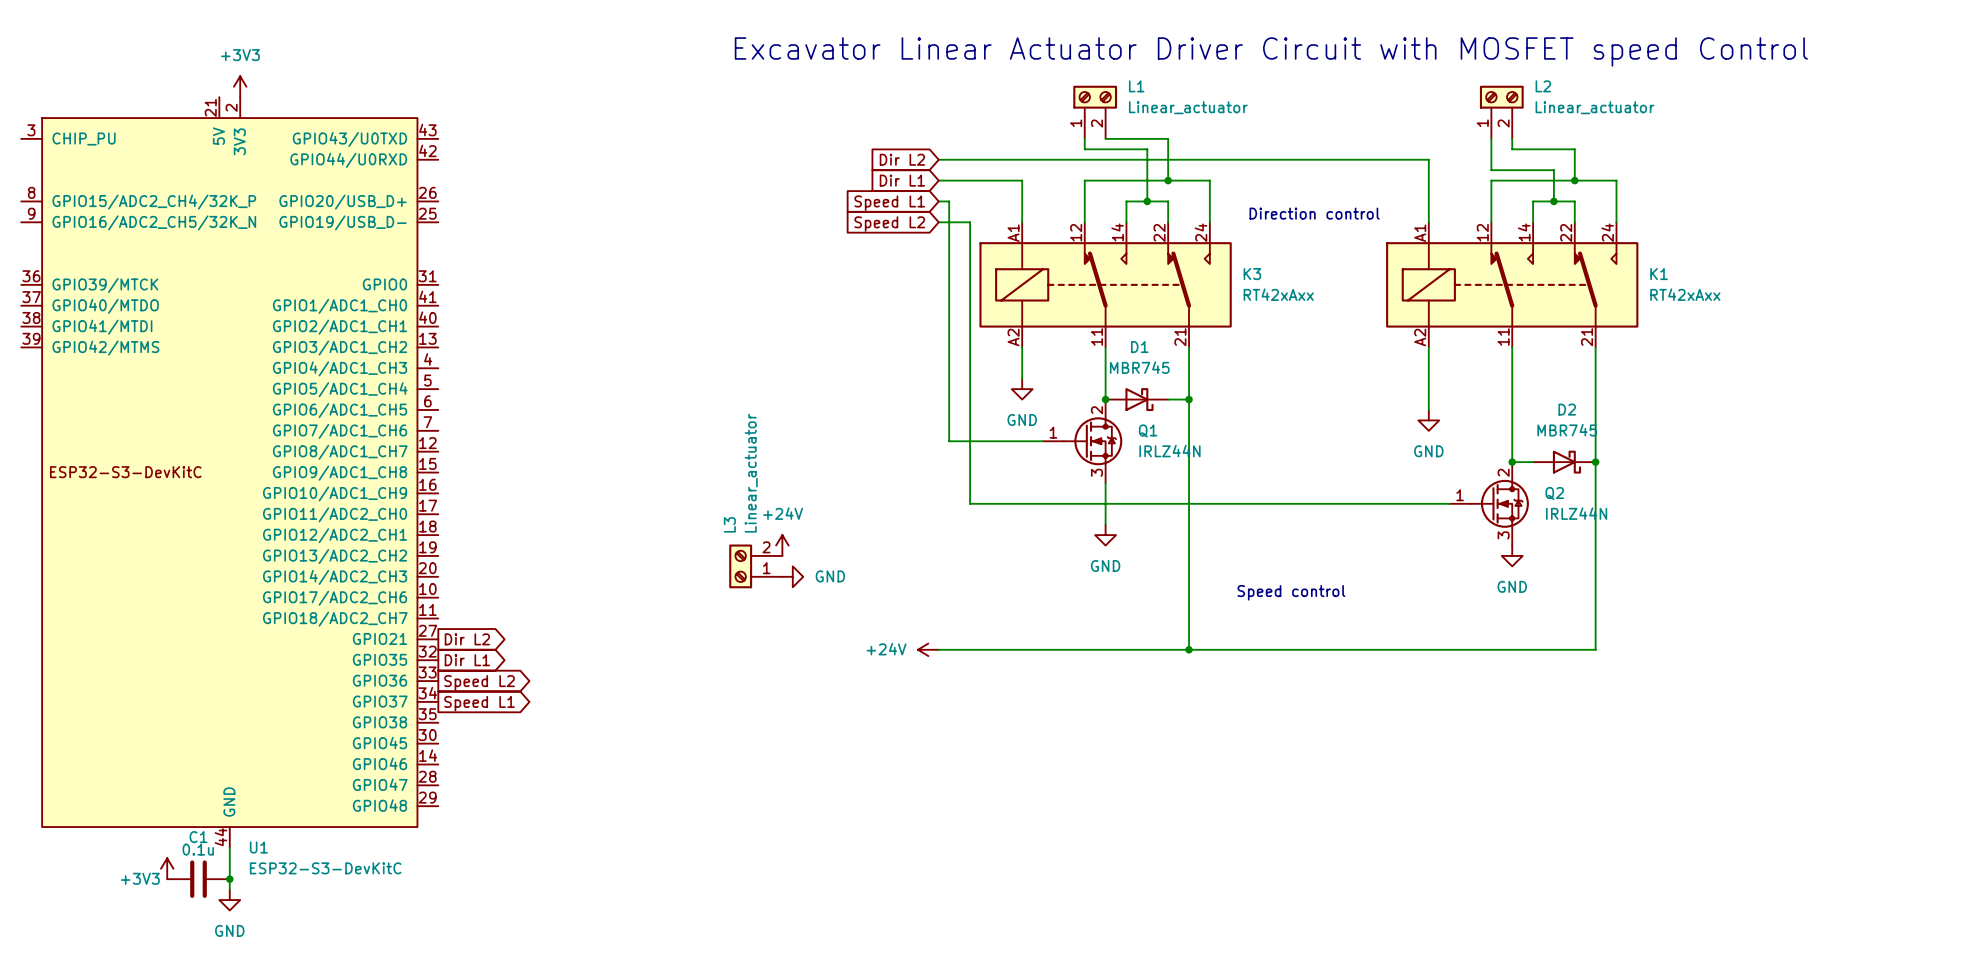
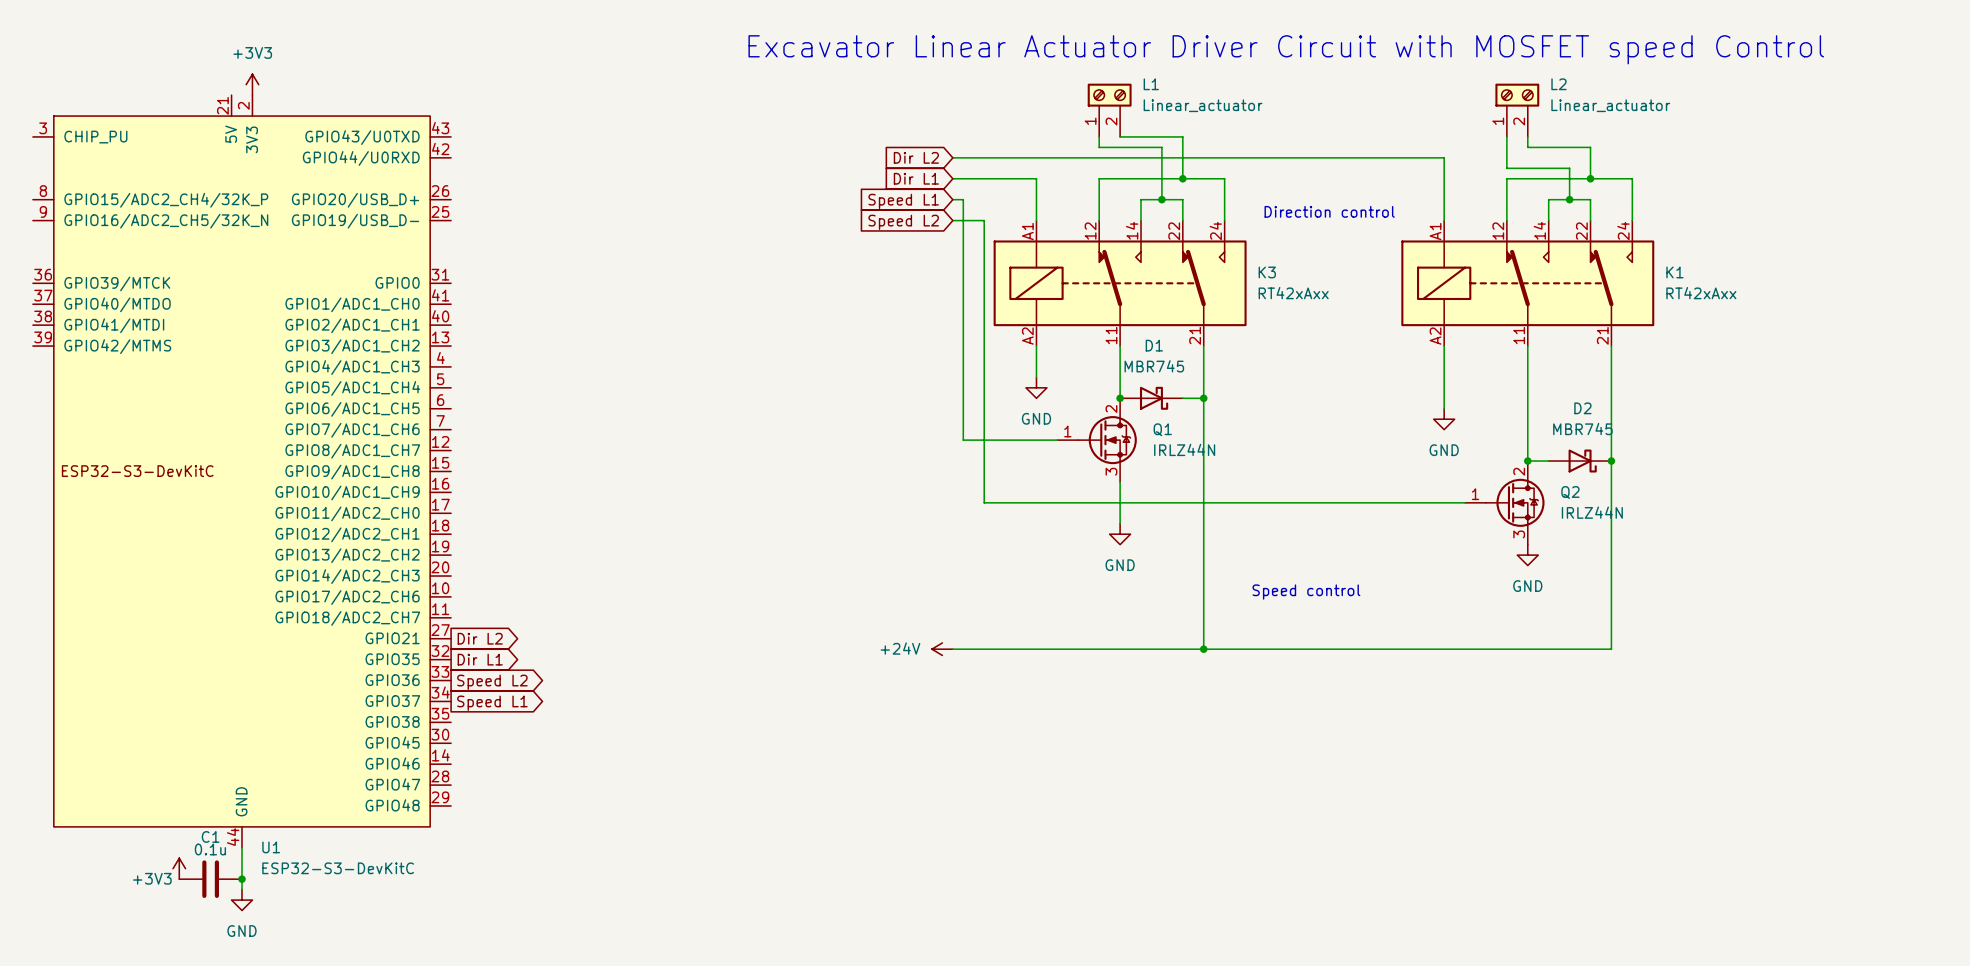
power symbol: +24V (782, 545) -> none
L3: Linear_actuator (755, 566) -> none
power symbol: GND (792, 576) -> none

